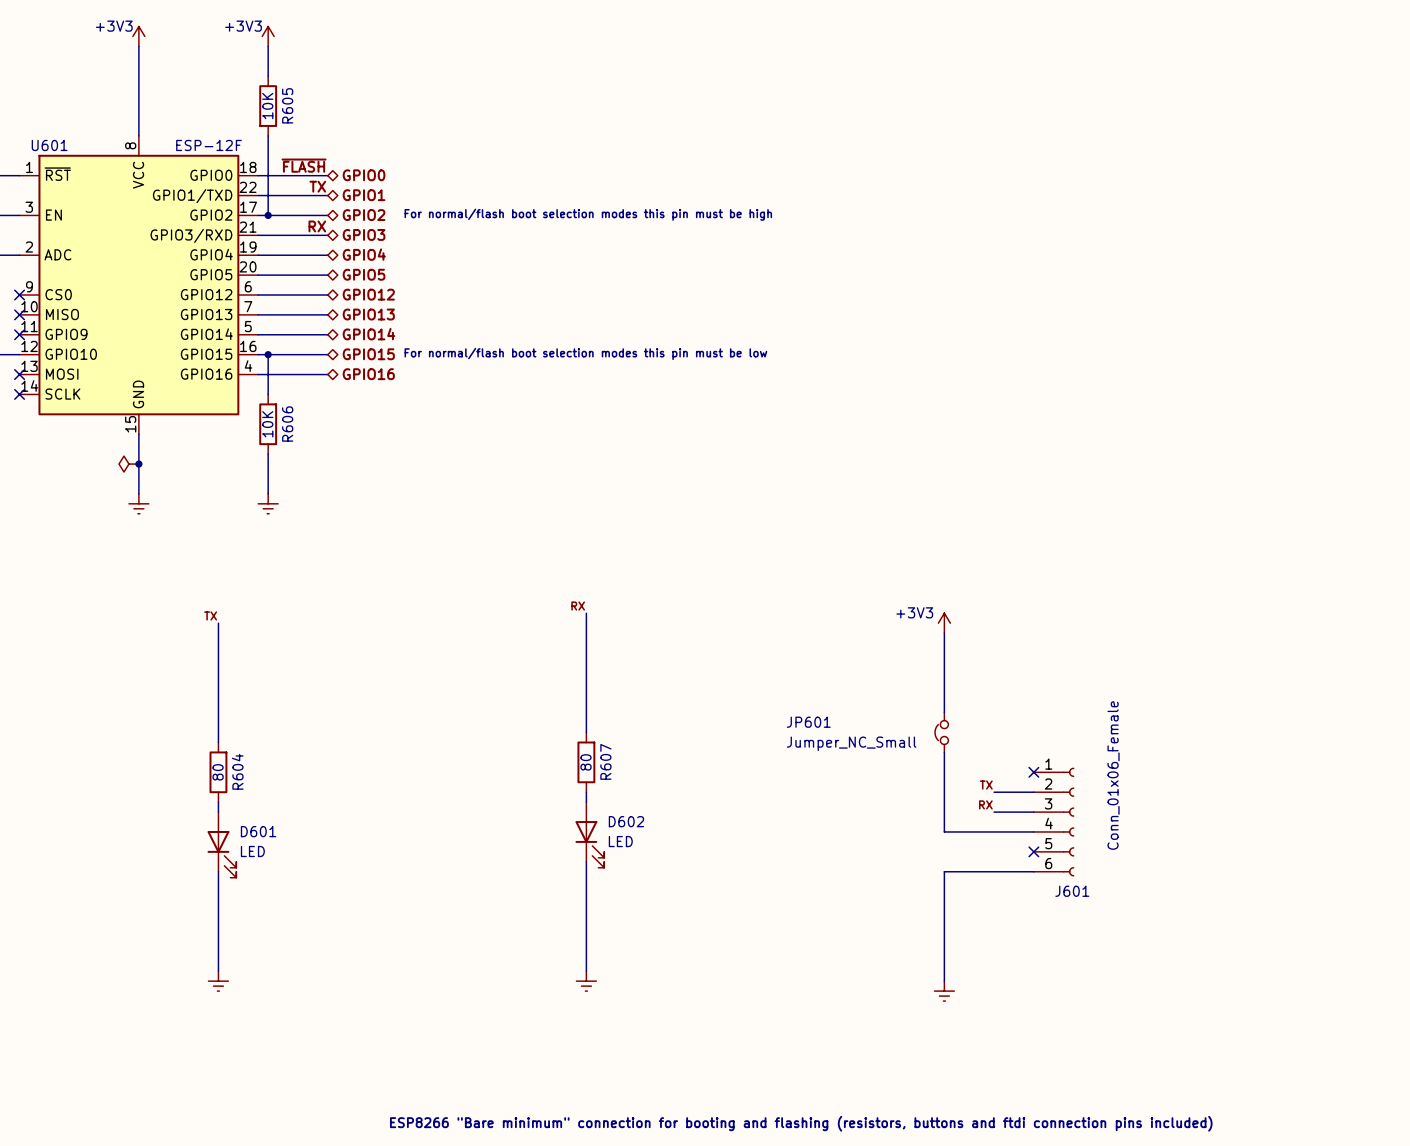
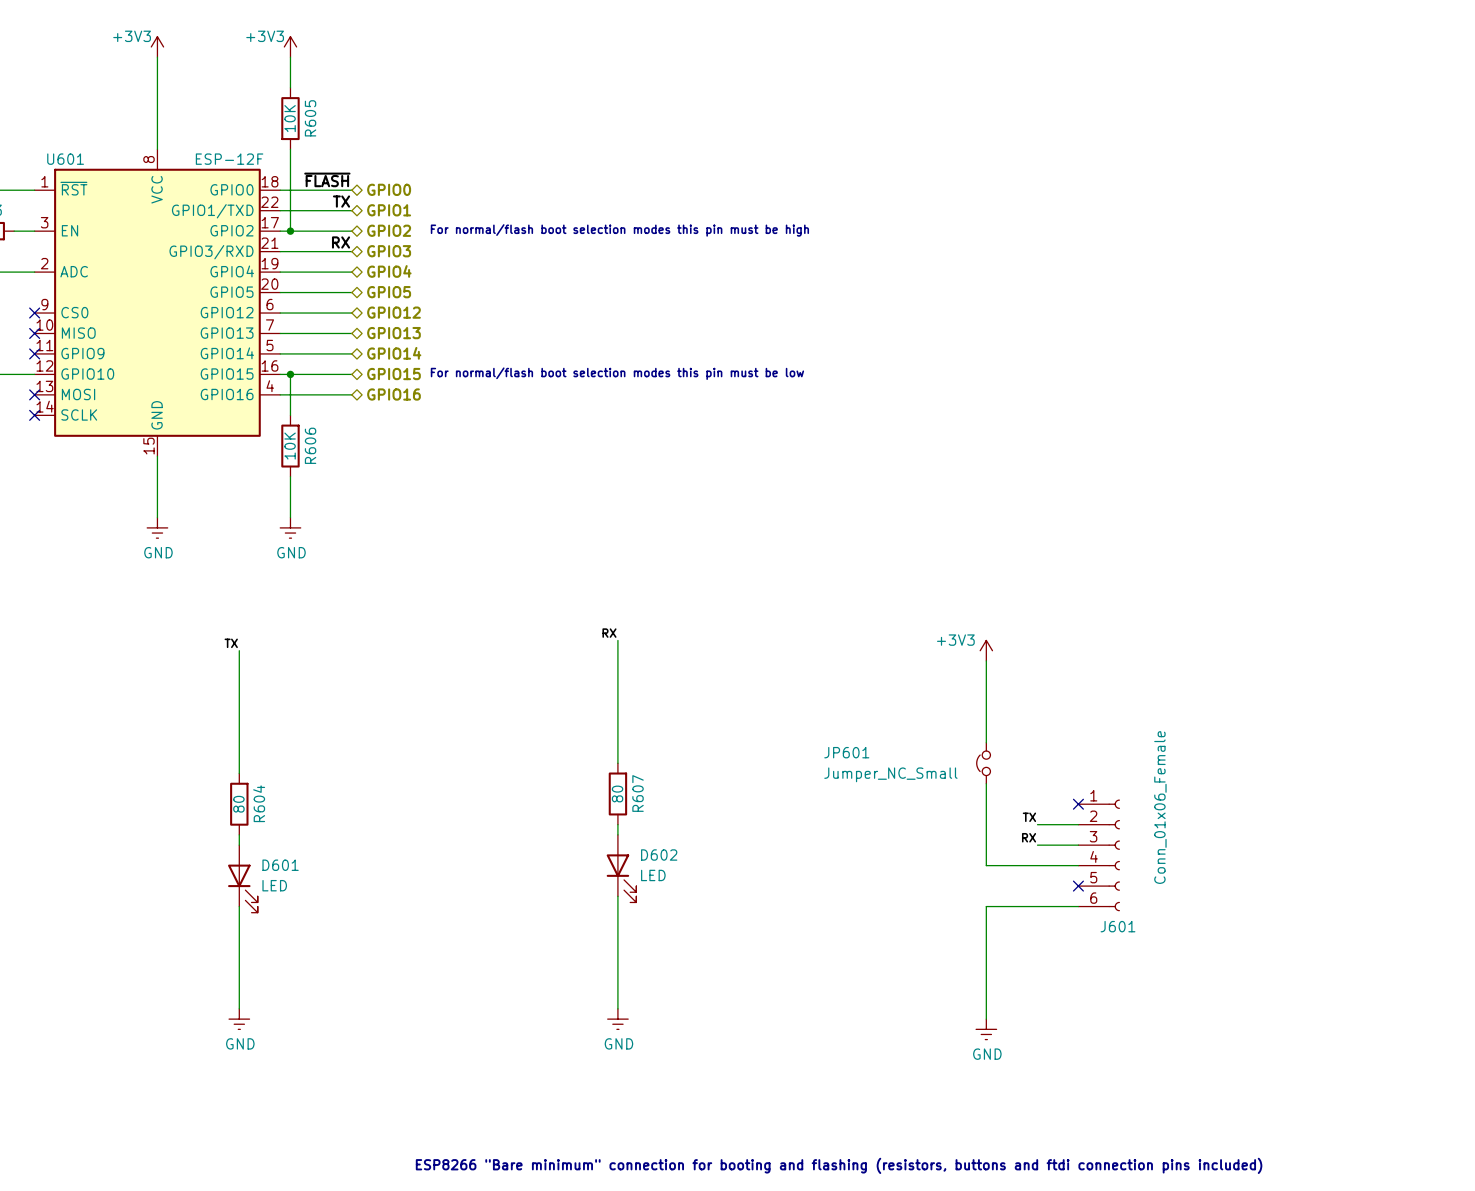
power symbol: (128, 464) -> none
junction: (138, 464) -> none
power symbol text: none -> GND (158, 552)
power symbol text: none -> GND (291, 552)
power symbol text: none -> GND (240, 1043)
power symbol text: none -> GND (618, 1043)
power symbol text: none -> GND (987, 1054)

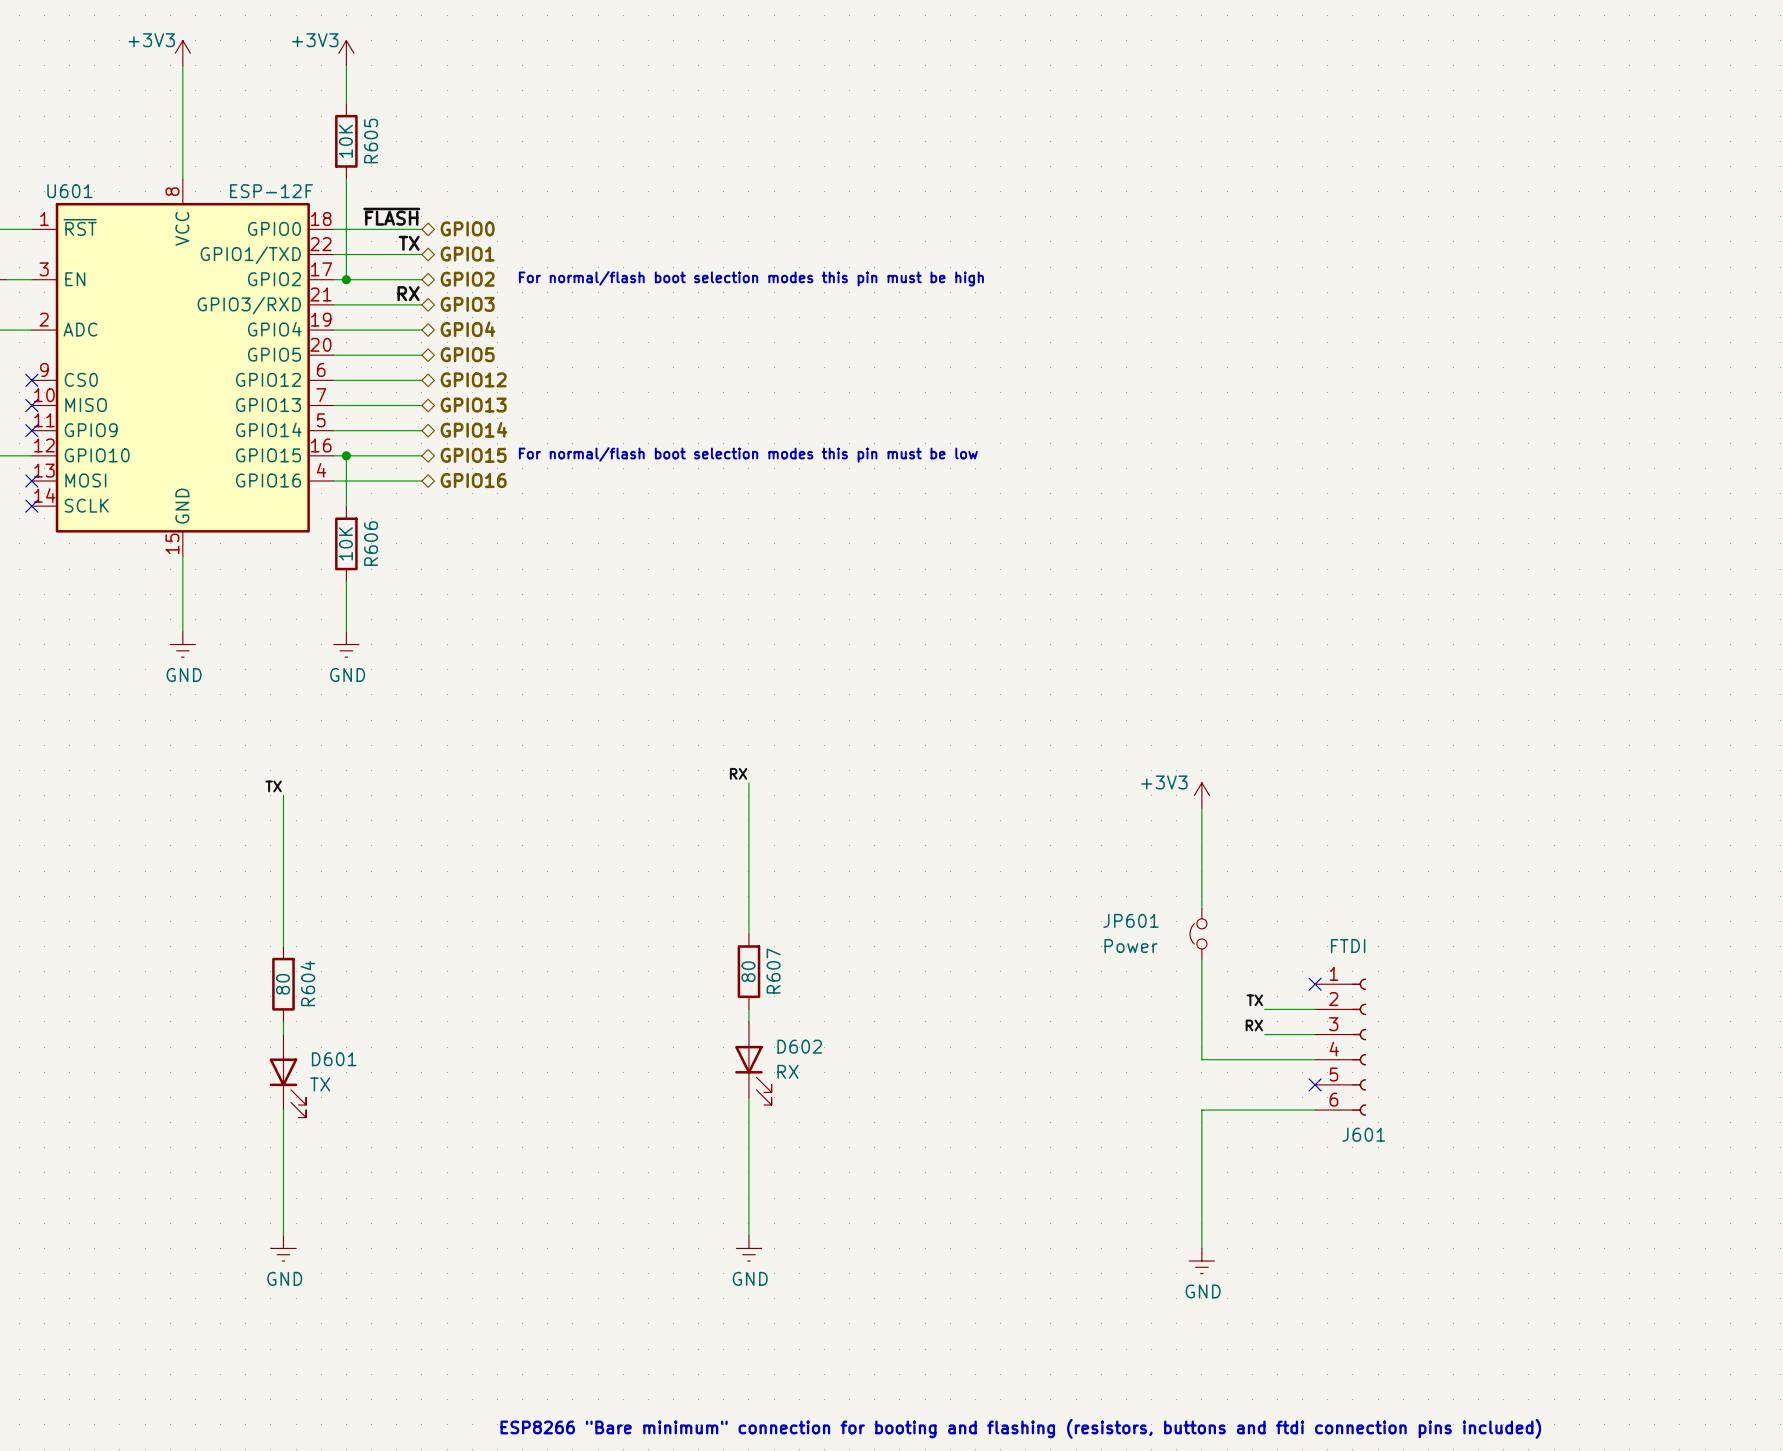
JP601 name position: JP601 (846, 752) -> JP601 (1130, 920)
JP601 value: Jumper_NC_Small (890, 774) -> Power (1130, 946)
J601 value: Conn_01x06_Female (1160, 807) -> FTDI (1348, 946)
D602 value: LED (653, 875) -> RX (788, 1071)
D601 value: LED (274, 885) -> TX (320, 1084)

